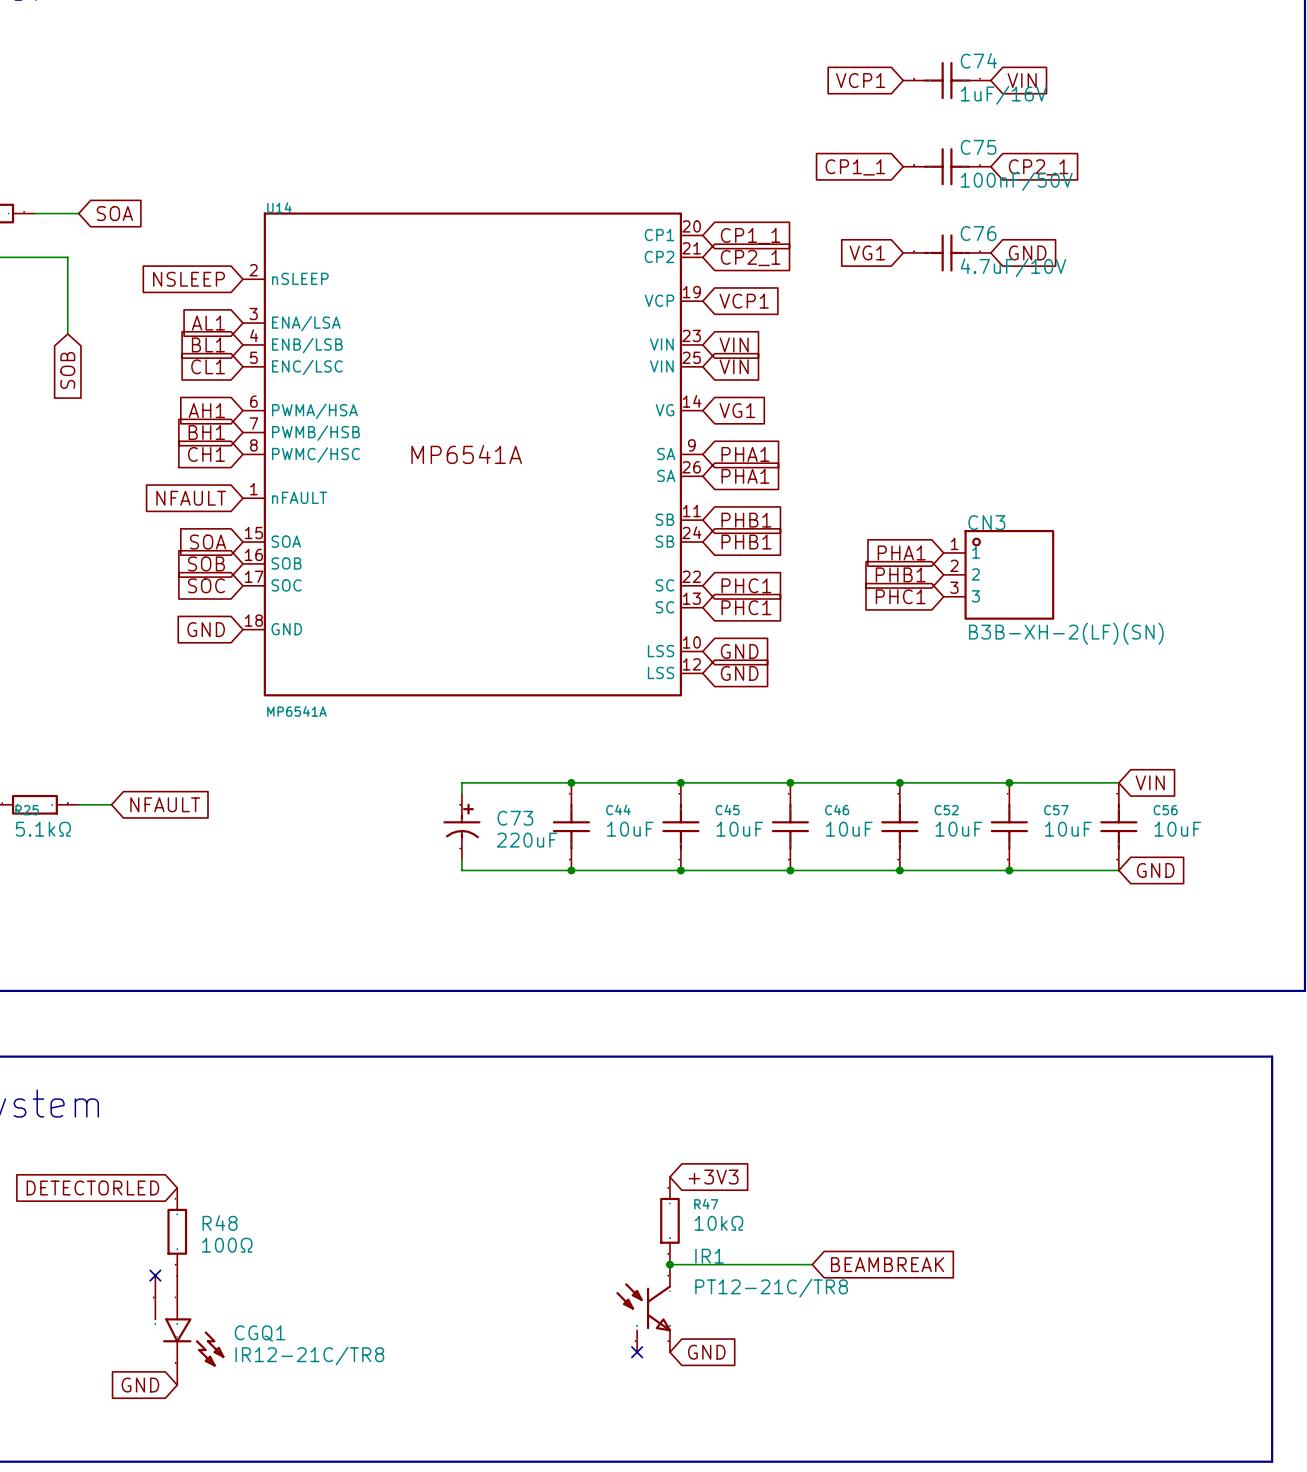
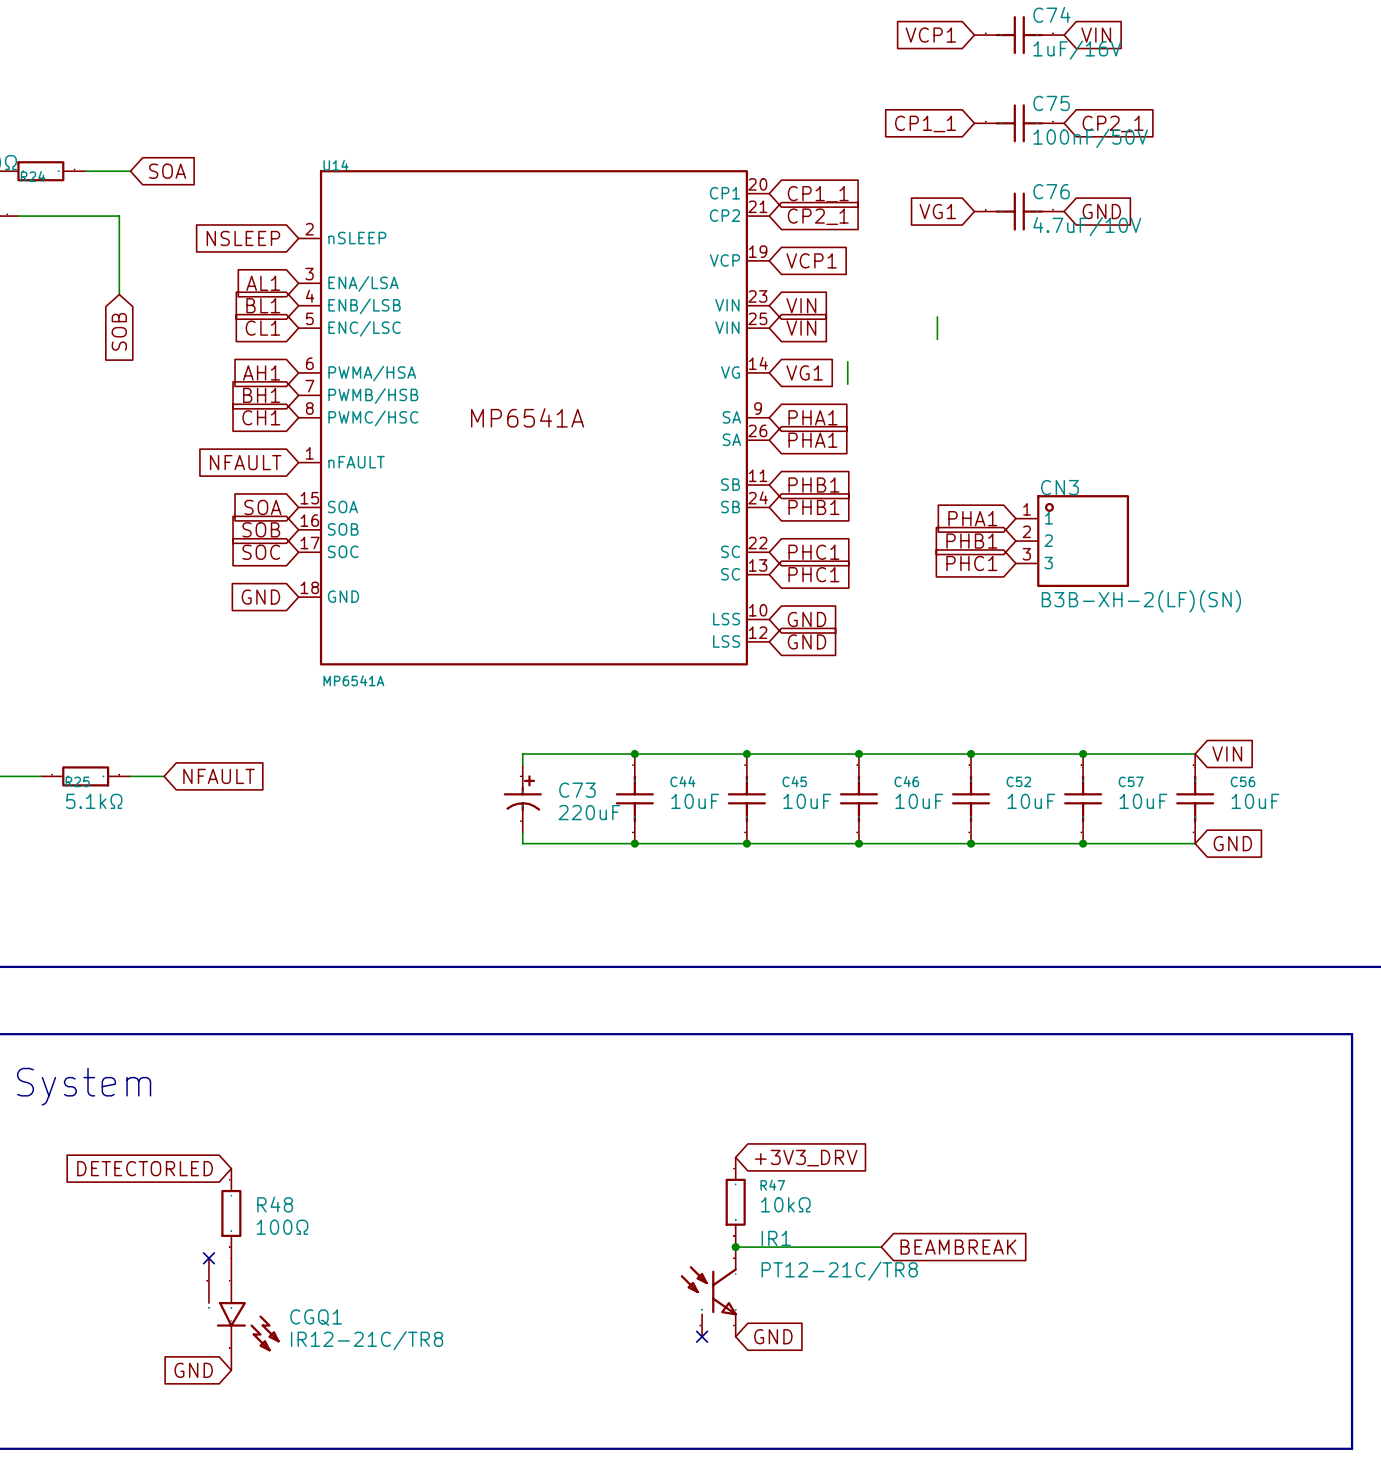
wire: none -> (937, 316) (937, 339)
wire: none -> (847, 361) (847, 384)
global label: +3V3 (713, 1177) -> +3V3_DRV (806, 1158)

